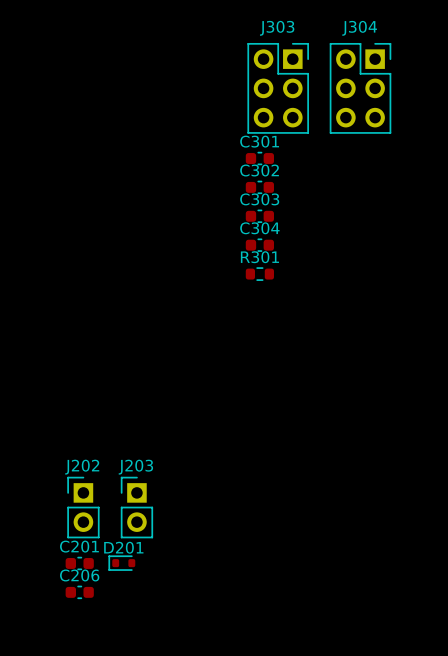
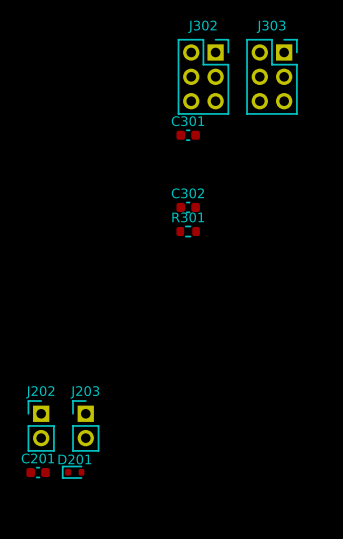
J303 name: J303 (277, 28) -> J302 (202, 26)
J304 name: J304 (359, 28) -> J303 (271, 26)
C302: (259, 187) -> none
C303: (259, 216) -> none
C304 name: C304 (259, 228) -> C302 (187, 193)
C206: (79, 592) -> none

